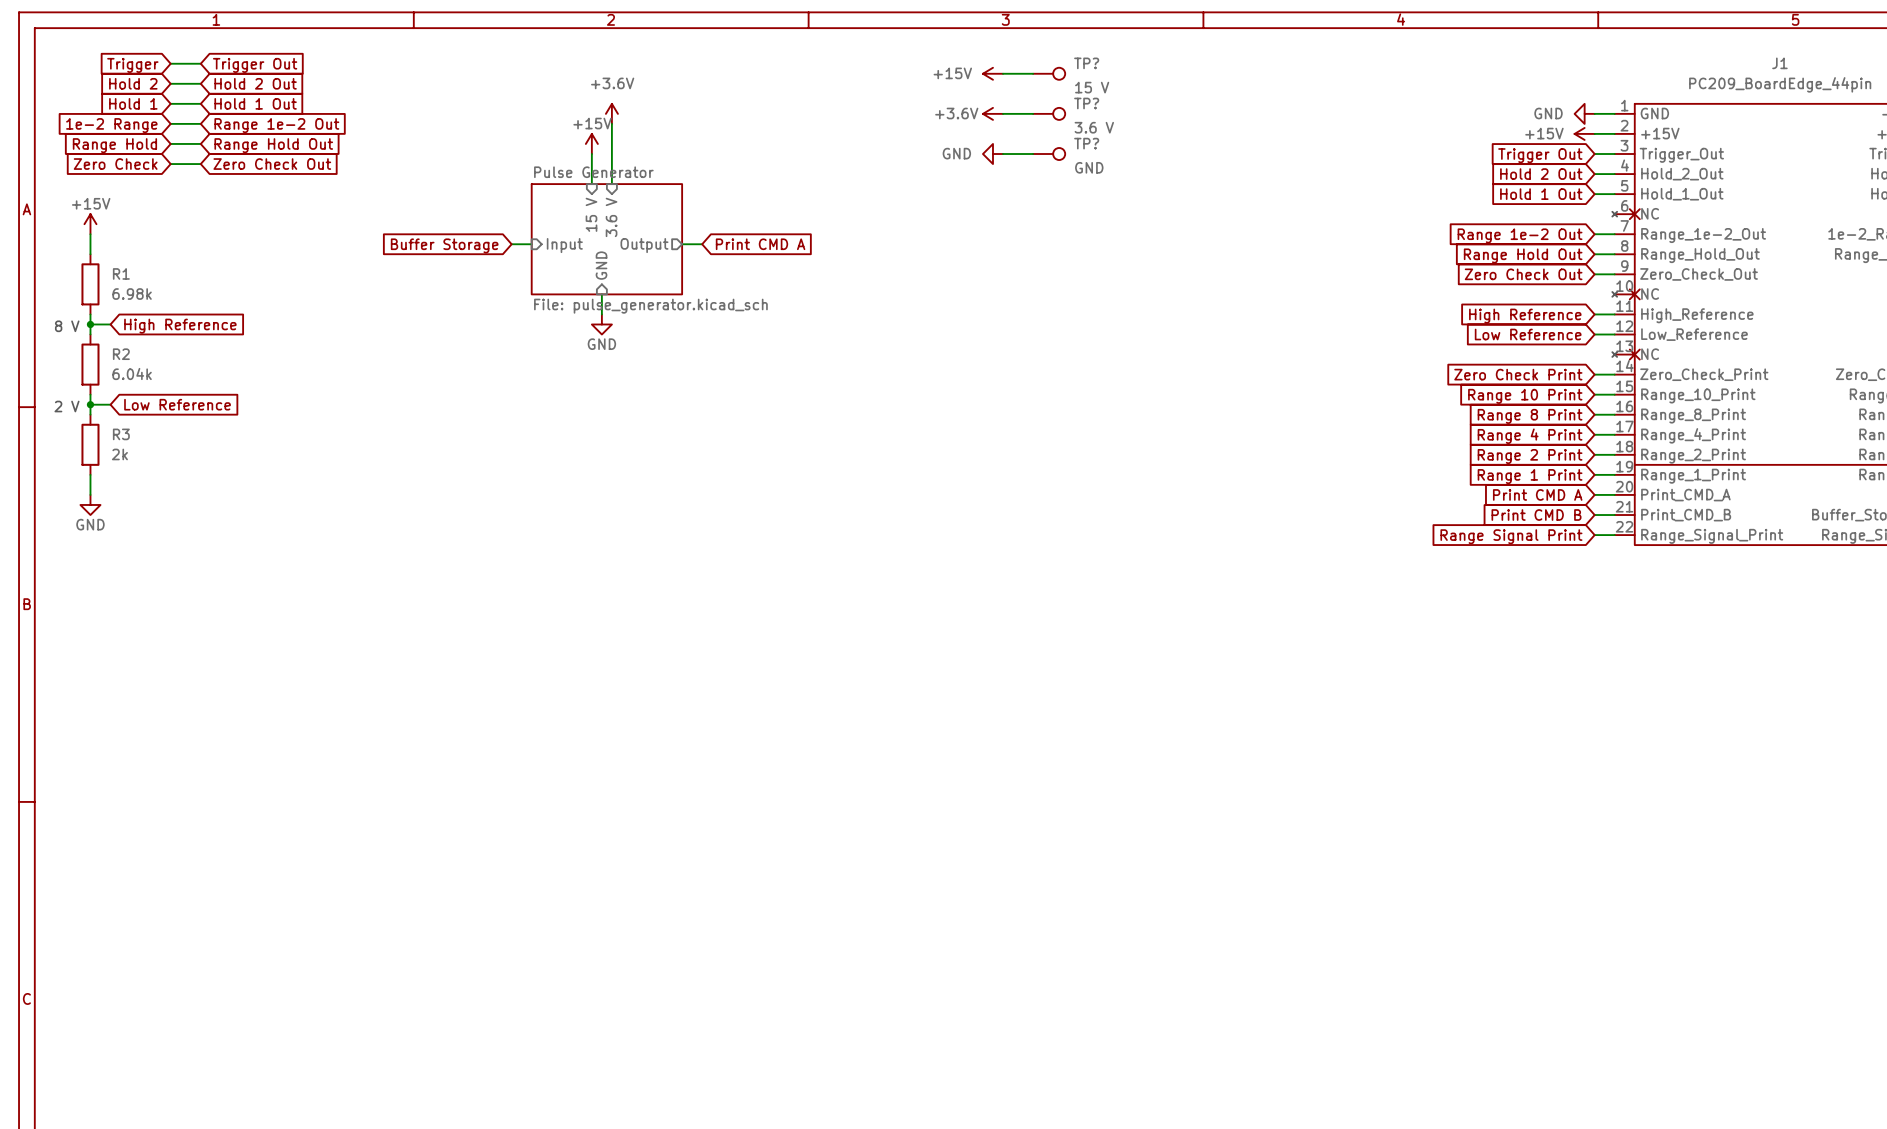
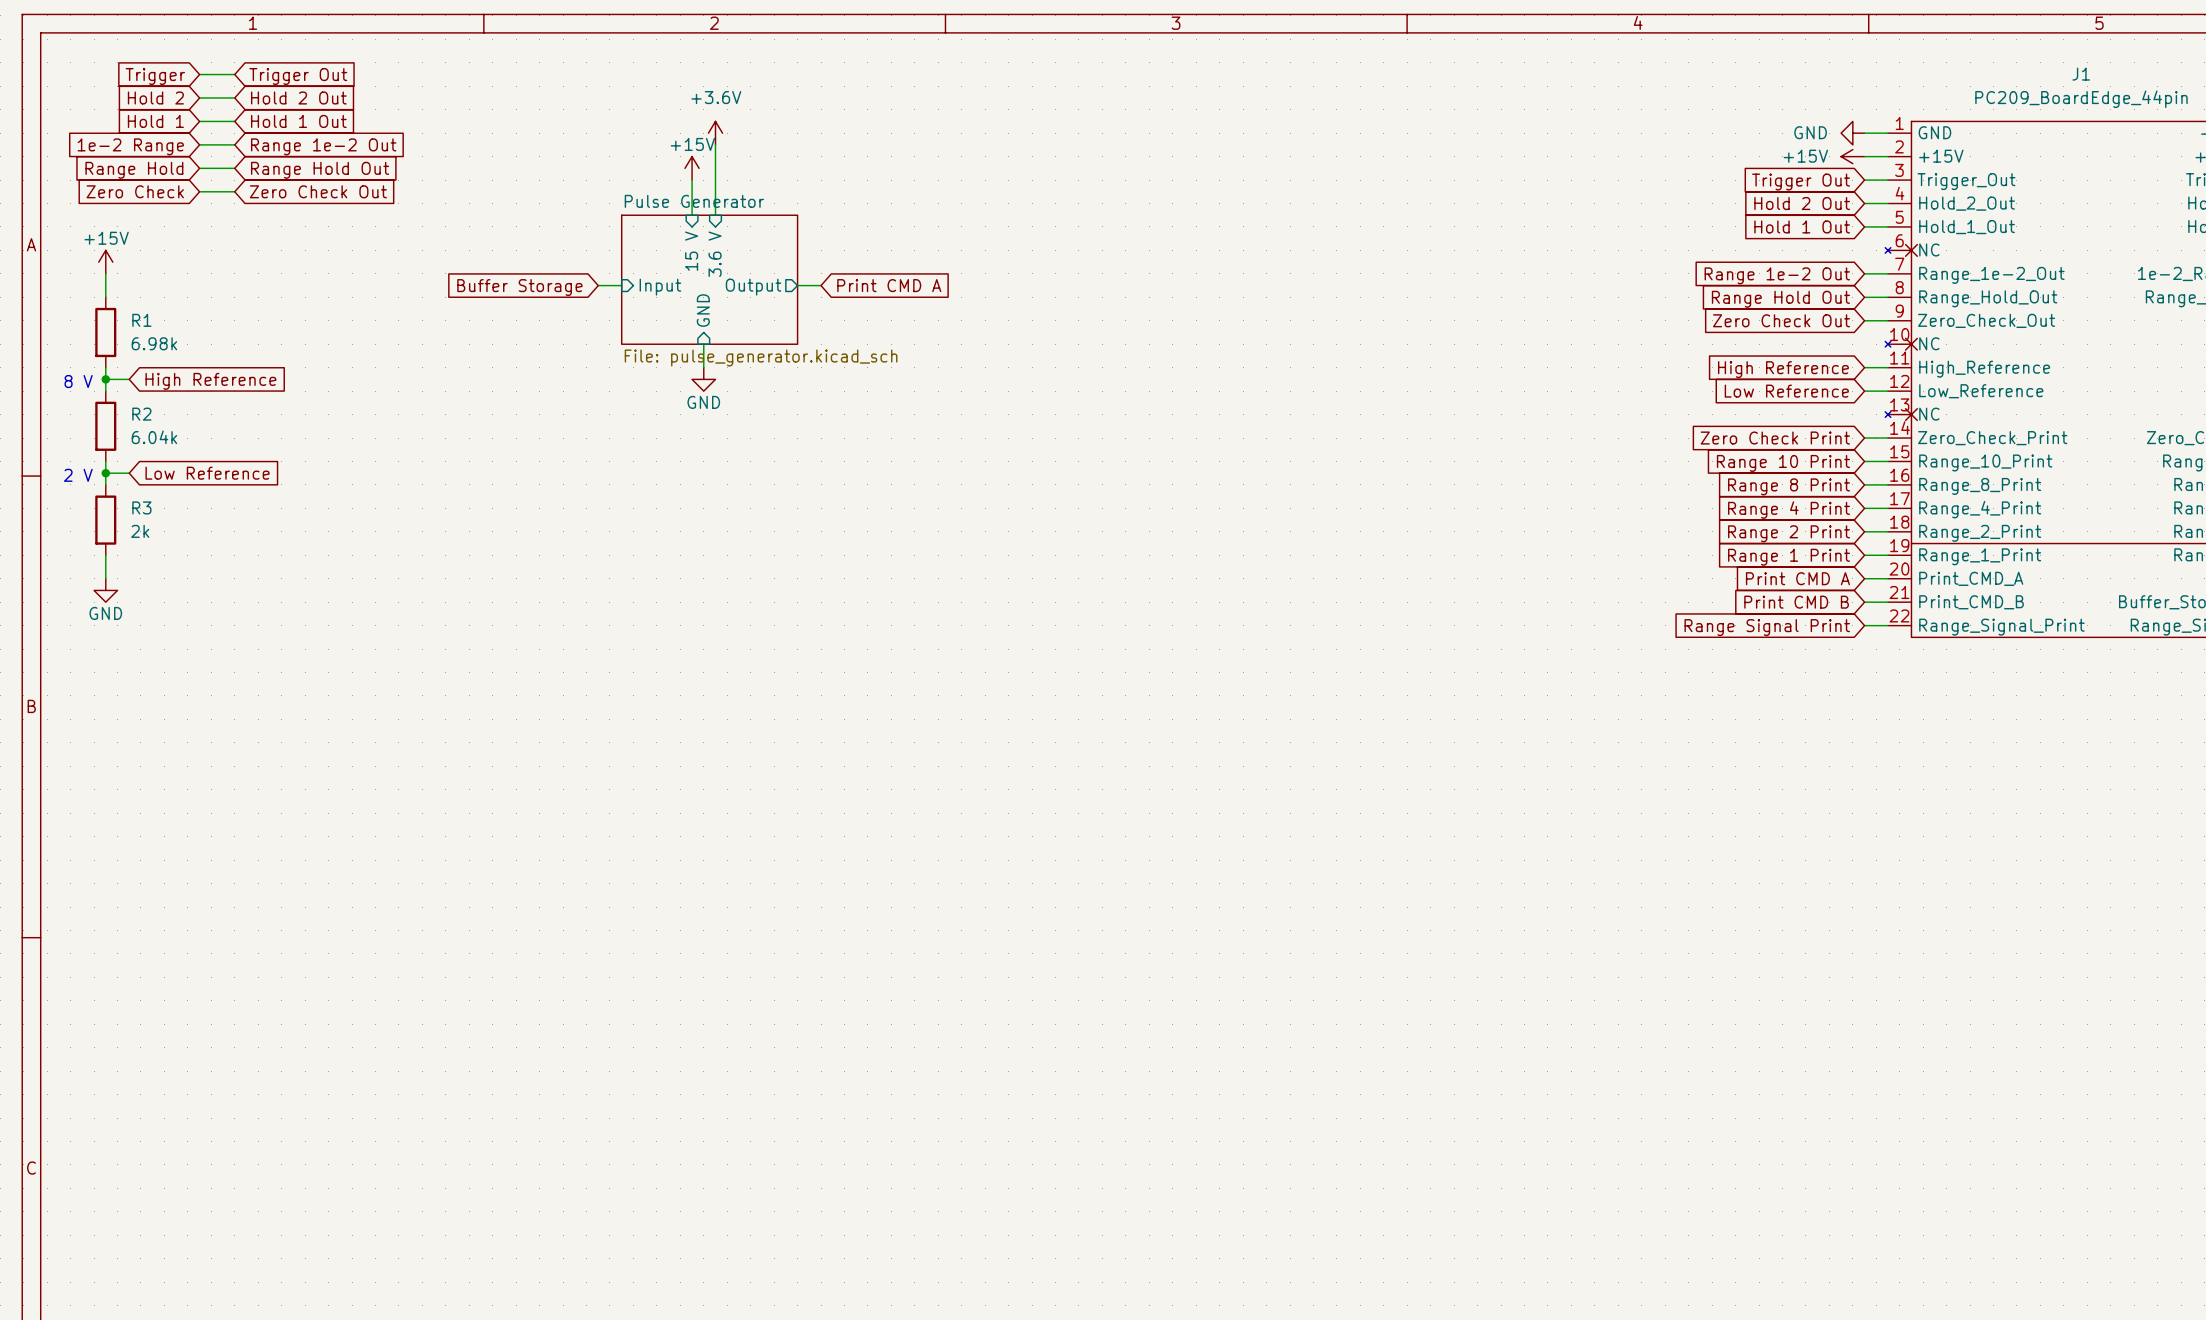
power symbol: +15V (992, 73) -> none
wire: (1003, 73) (1033, 73) -> none
TP?: 15 V (1049, 73) -> none
power symbol: +3.6V (992, 113) -> none
wire: (1003, 113) (1033, 113) -> none
TP?: 3.6 V (1049, 113) -> none
power symbol: GND (992, 154) -> none
wire: (1003, 154) (1033, 154) -> none
TP?: GND (1049, 154) -> none

